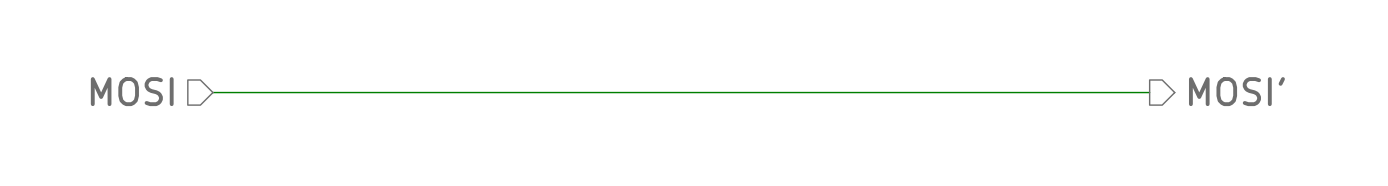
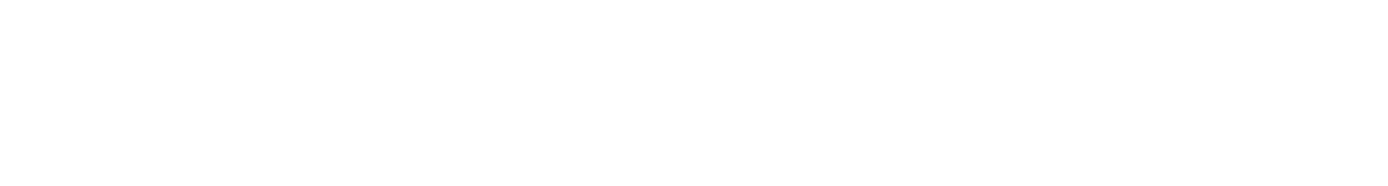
hierarchical label: MOSI (132, 91) -> none
hierarchical label: MOSI' (1236, 91) -> none
wire: (212, 92) (1149, 92) -> none

